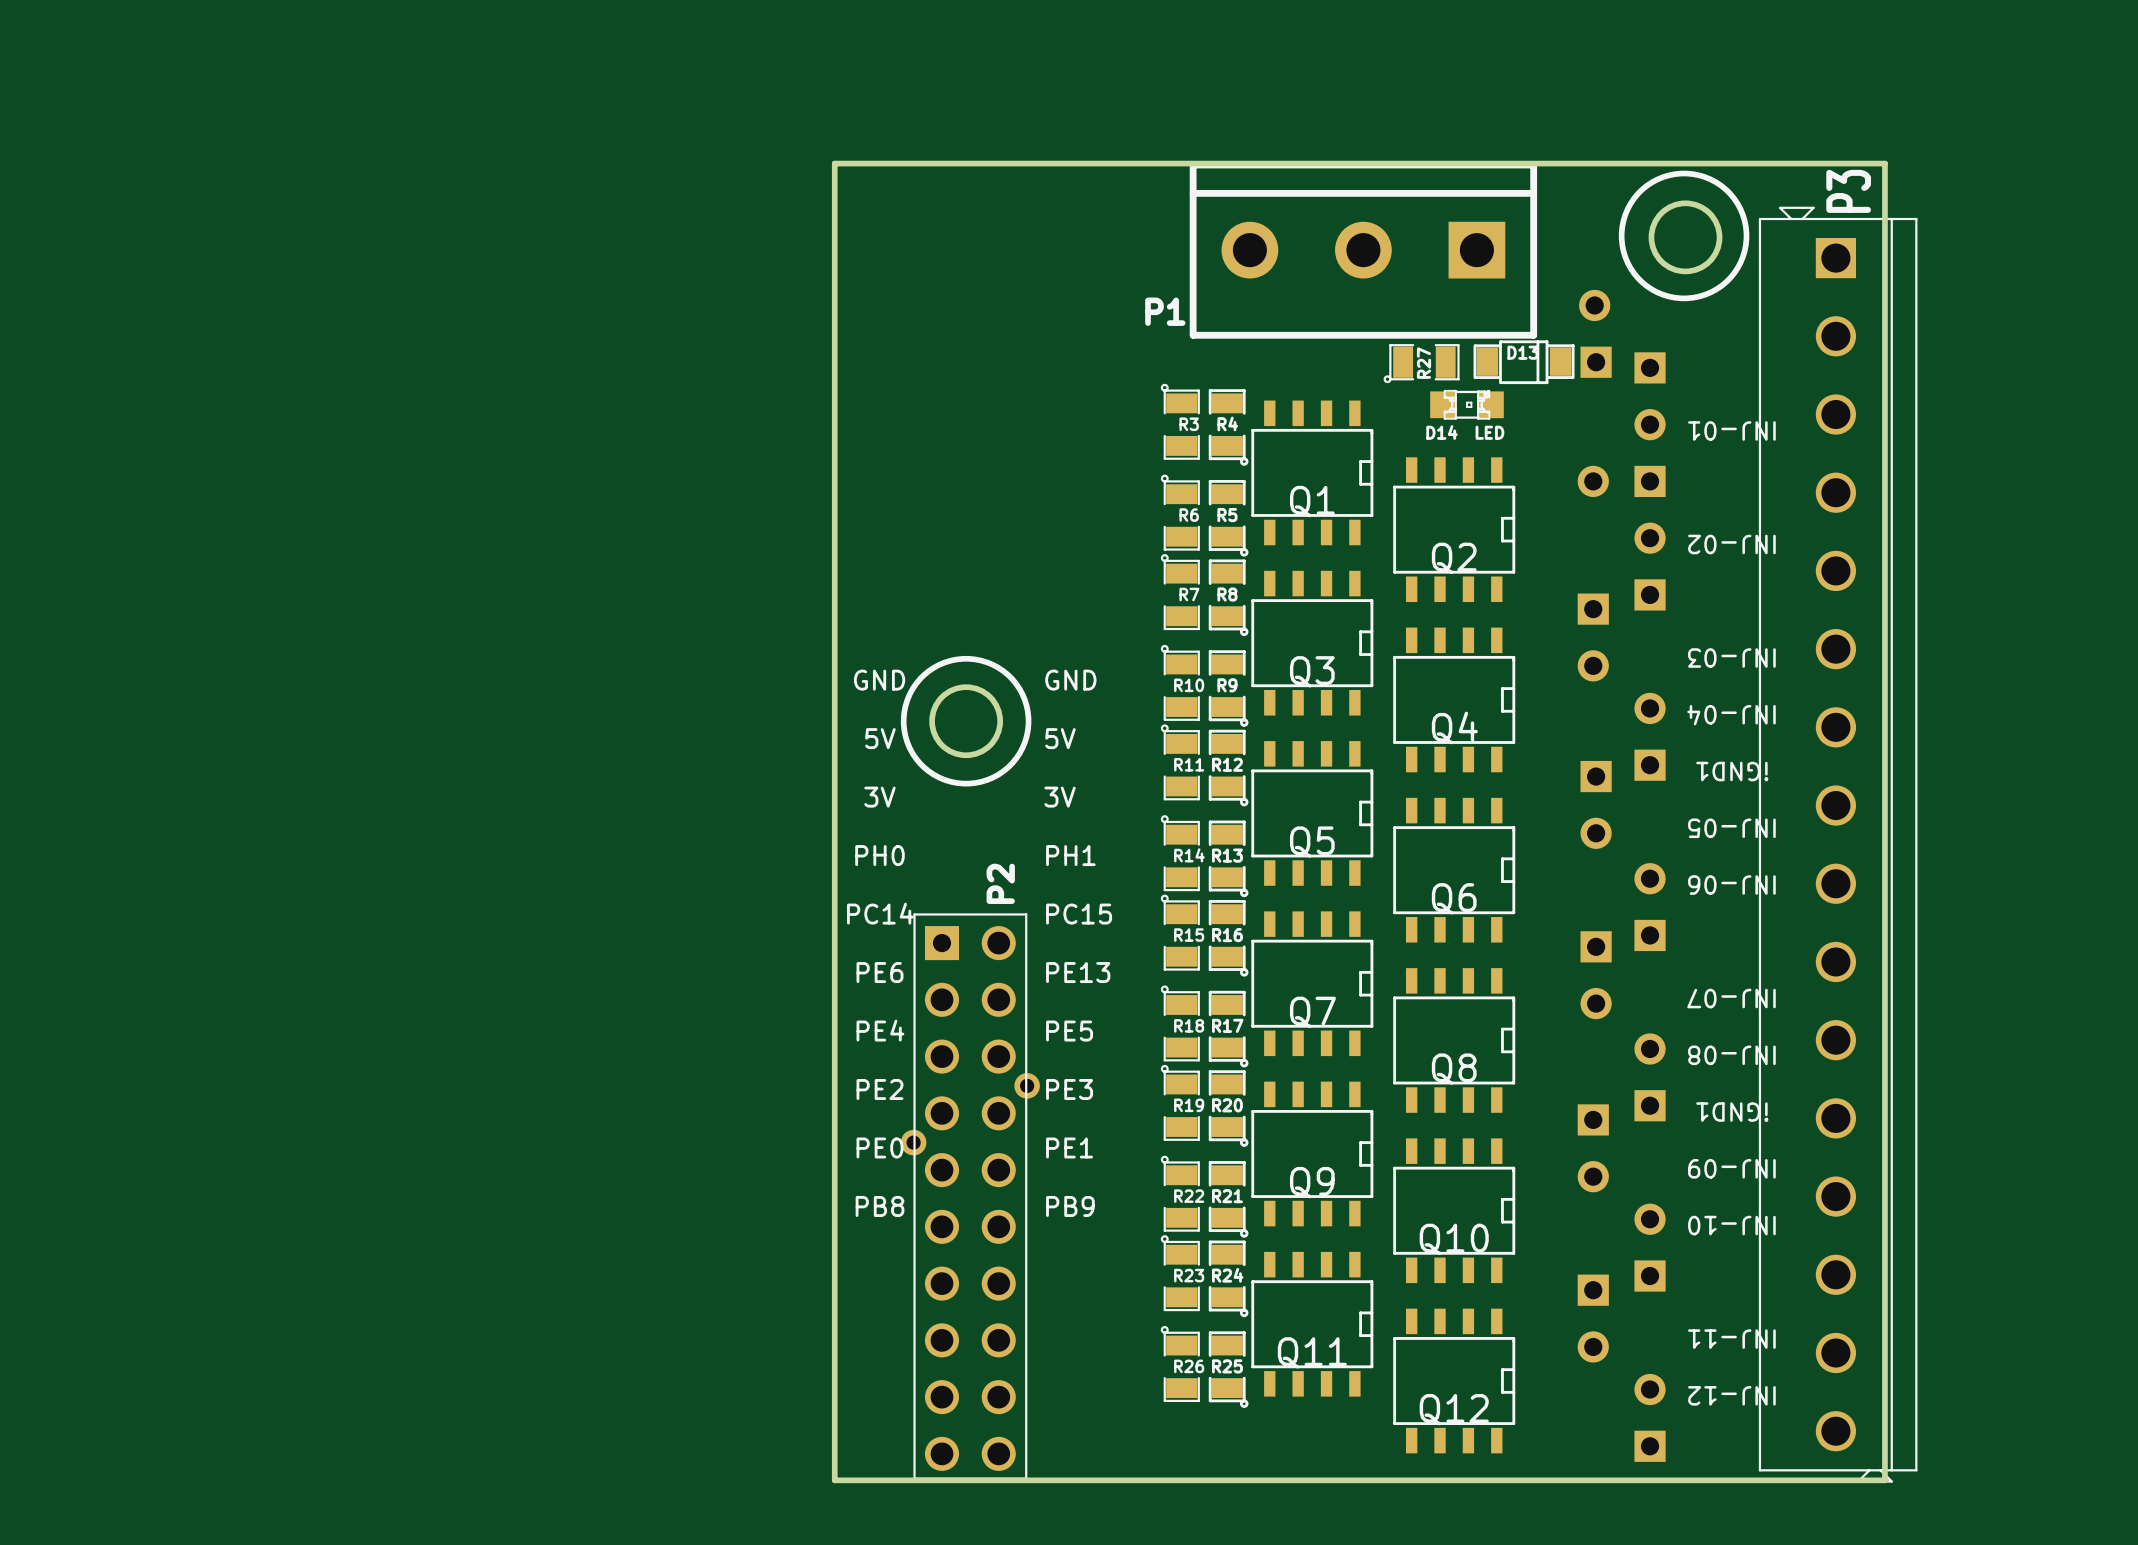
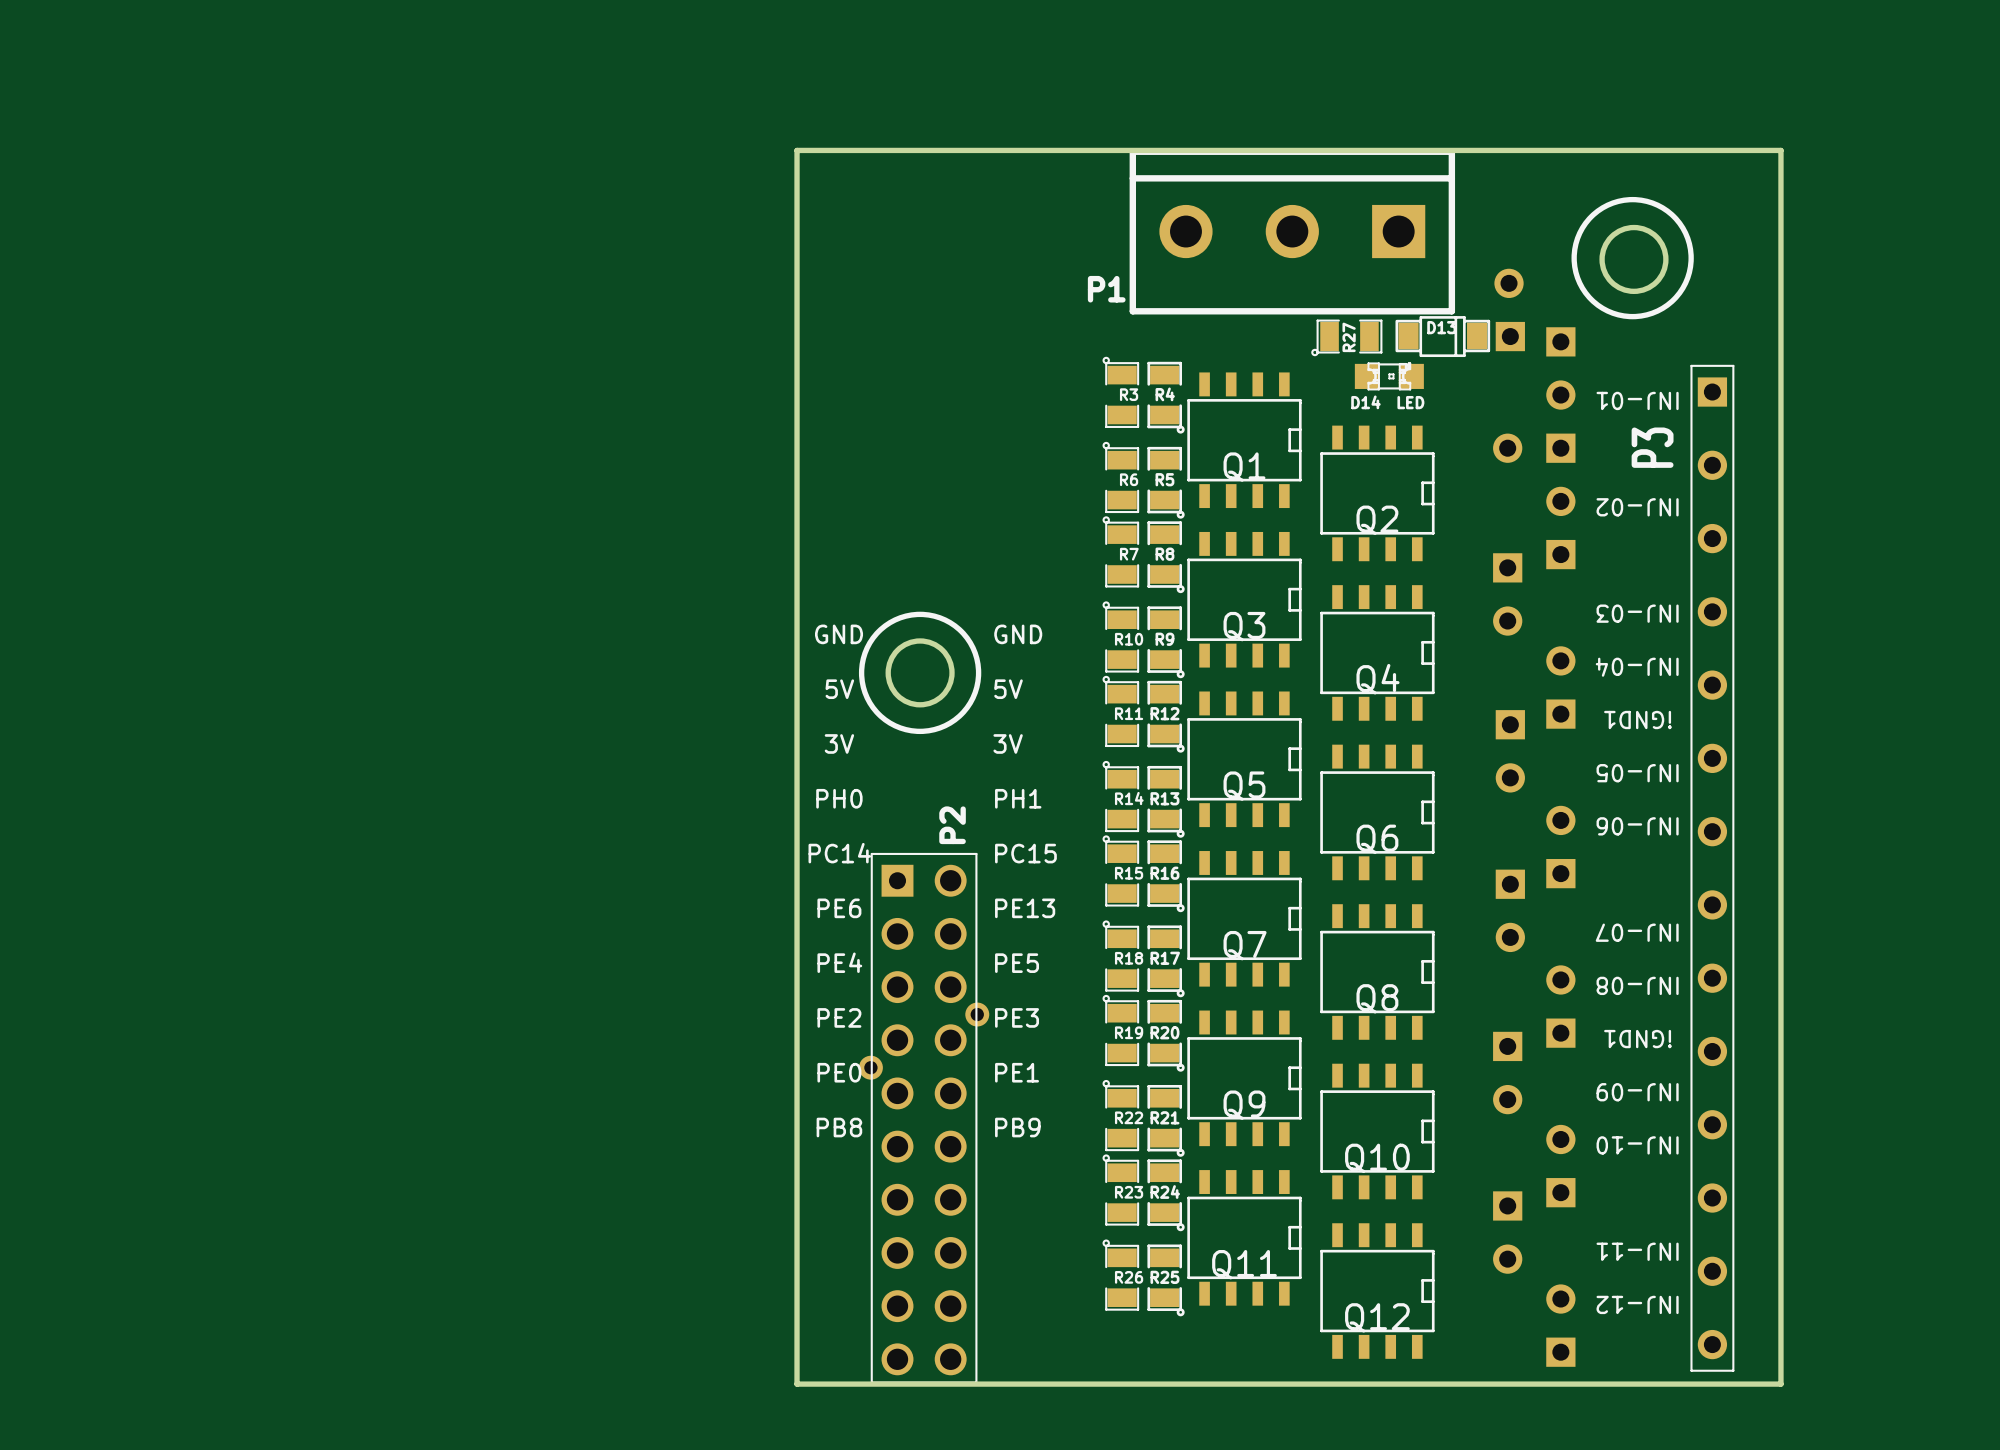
P3 name position: P3 (1848, 191) -> P3 (1652, 447)
P3 footprint: [1758, 206, 1918, 1483] -> [1690, 364, 1735, 1372]
drawing position: (1684, 235) -> (1632, 258)
round board edge position: (1685, 237) -> (1633, 259)

